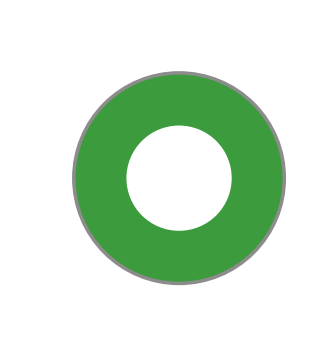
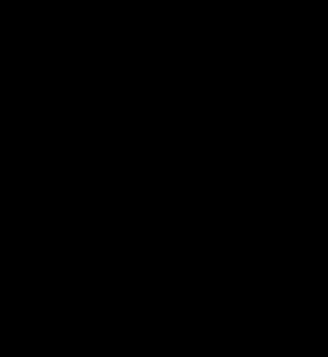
part: (179, 178) -> none

